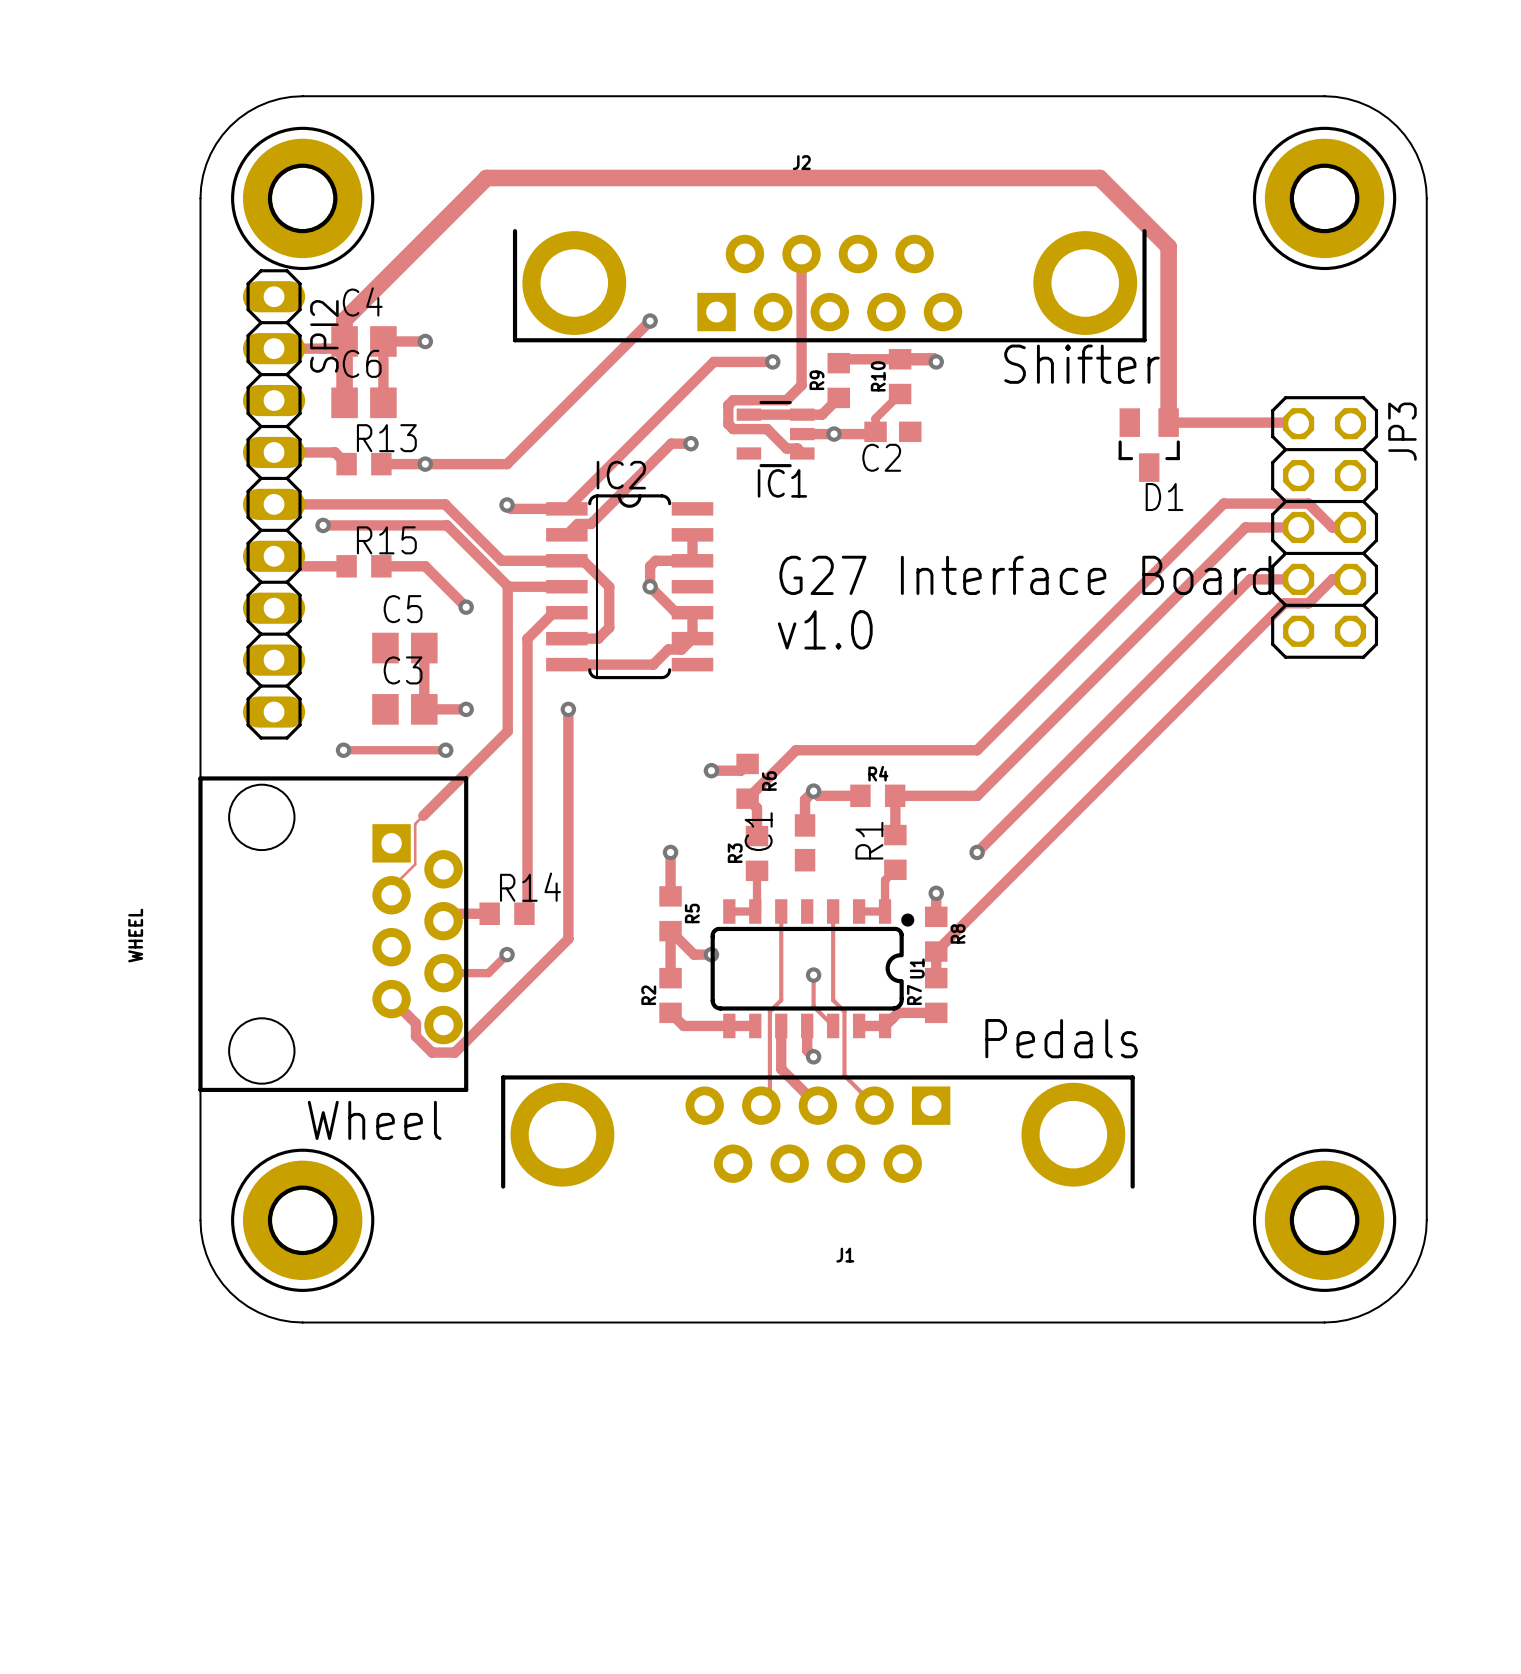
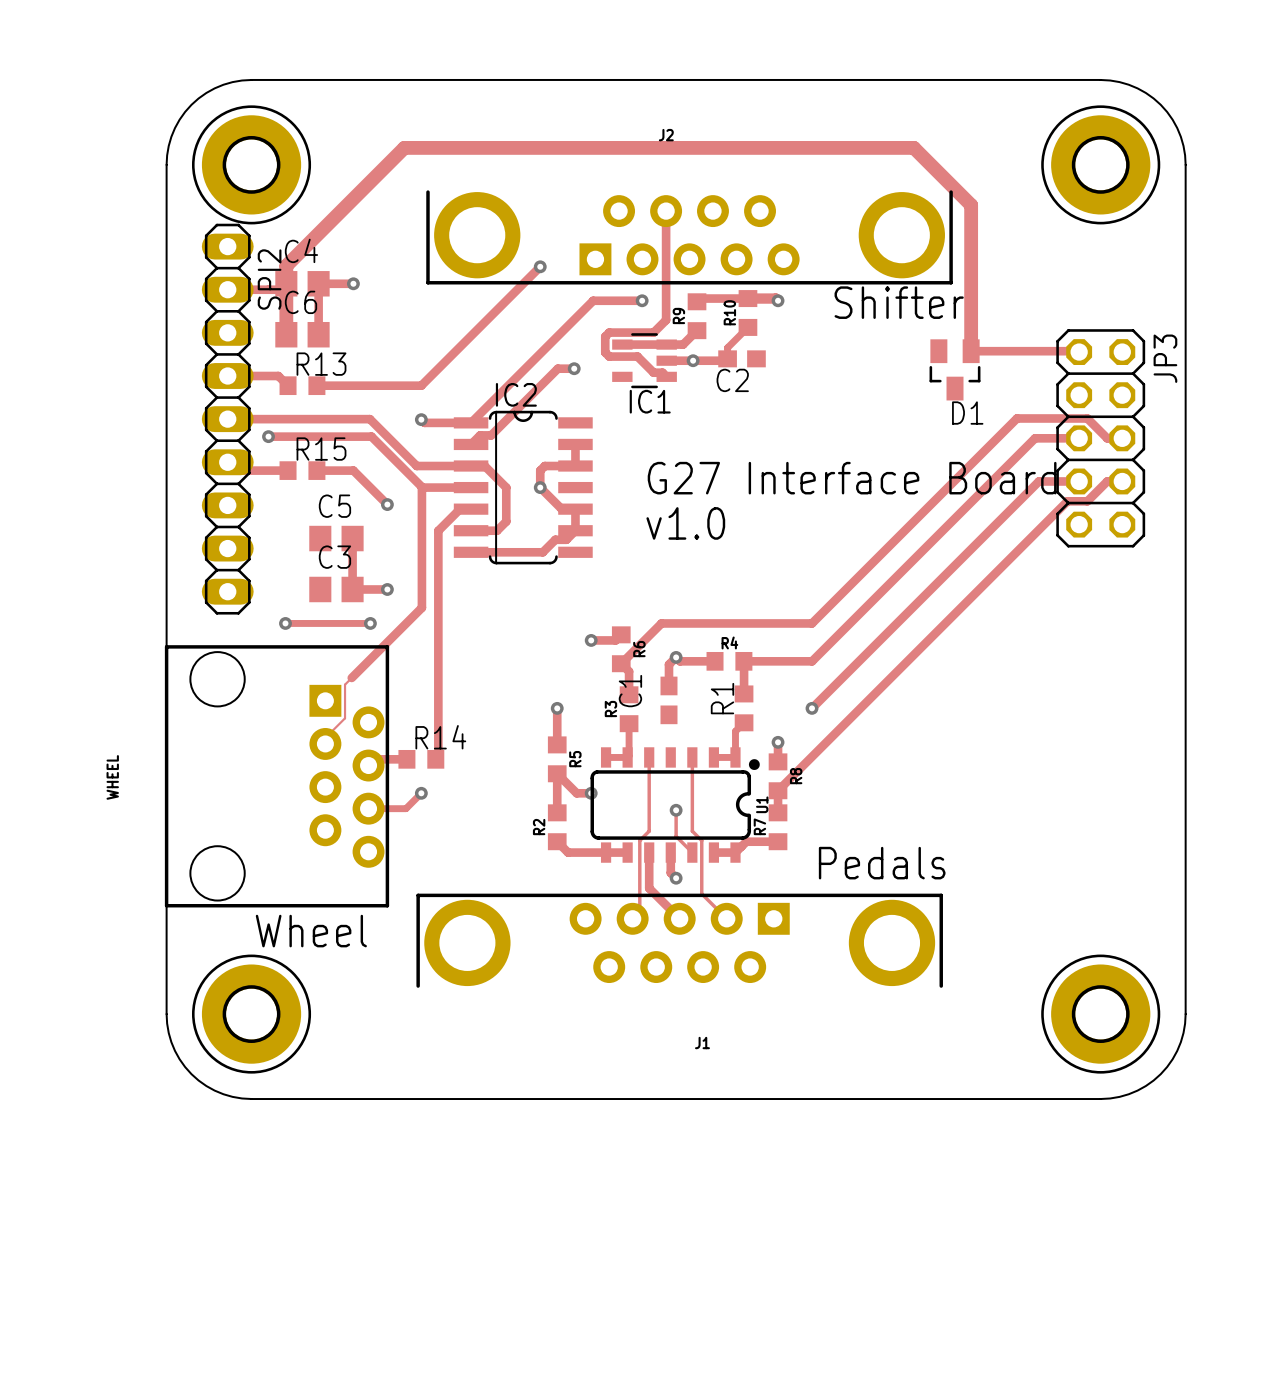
via: (425, 464) -> none
track: (568, 709) (568, 939) (454, 1052) (432, 1052) (415, 1036) (415, 1023) (391, 999) -> none
via: (568, 709) -> none

